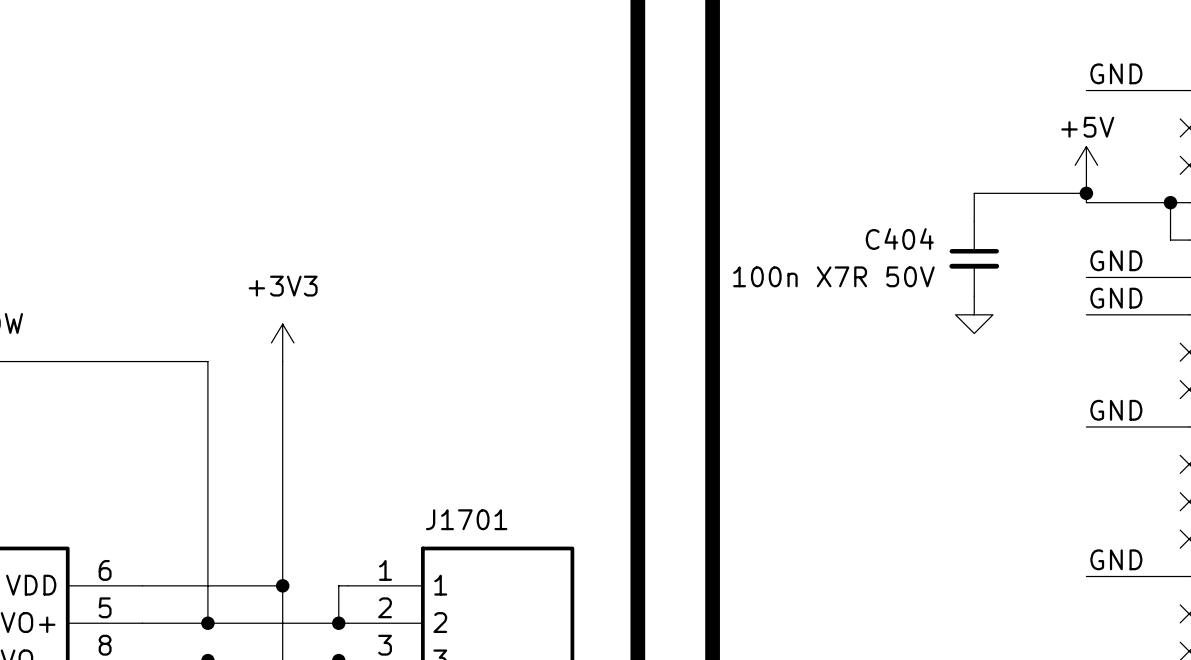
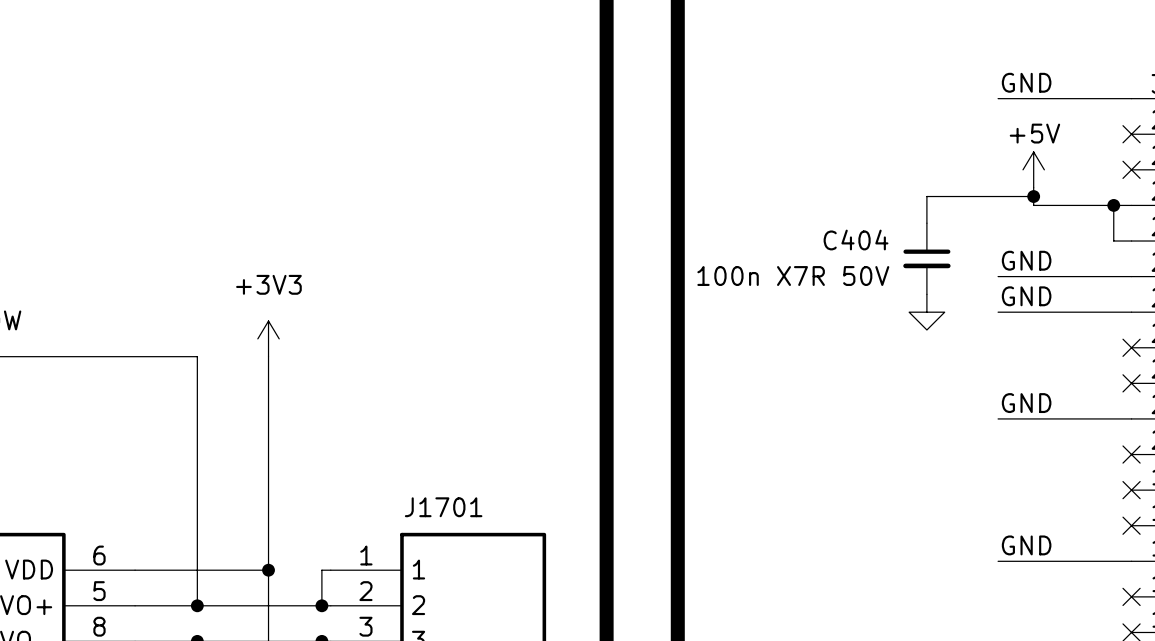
label position: GND (1116, 73) -> GND (1026, 82)
wire: none -> (998, 98) (1033, 98)
label: none -> GND (1026, 260)
label: GND (1116, 260) -> none
wire: none -> (998, 276) (1033, 276)
label: none -> GND (1026, 296)
label: GND (1116, 298) -> none
wire: none -> (998, 312) (1033, 312)
label position: GND (1116, 410) -> GND (1026, 403)
wire: none -> (998, 418) (1033, 418)
label position: GND (1116, 559) -> GND (1026, 545)
wire: none -> (998, 561) (1033, 561)

